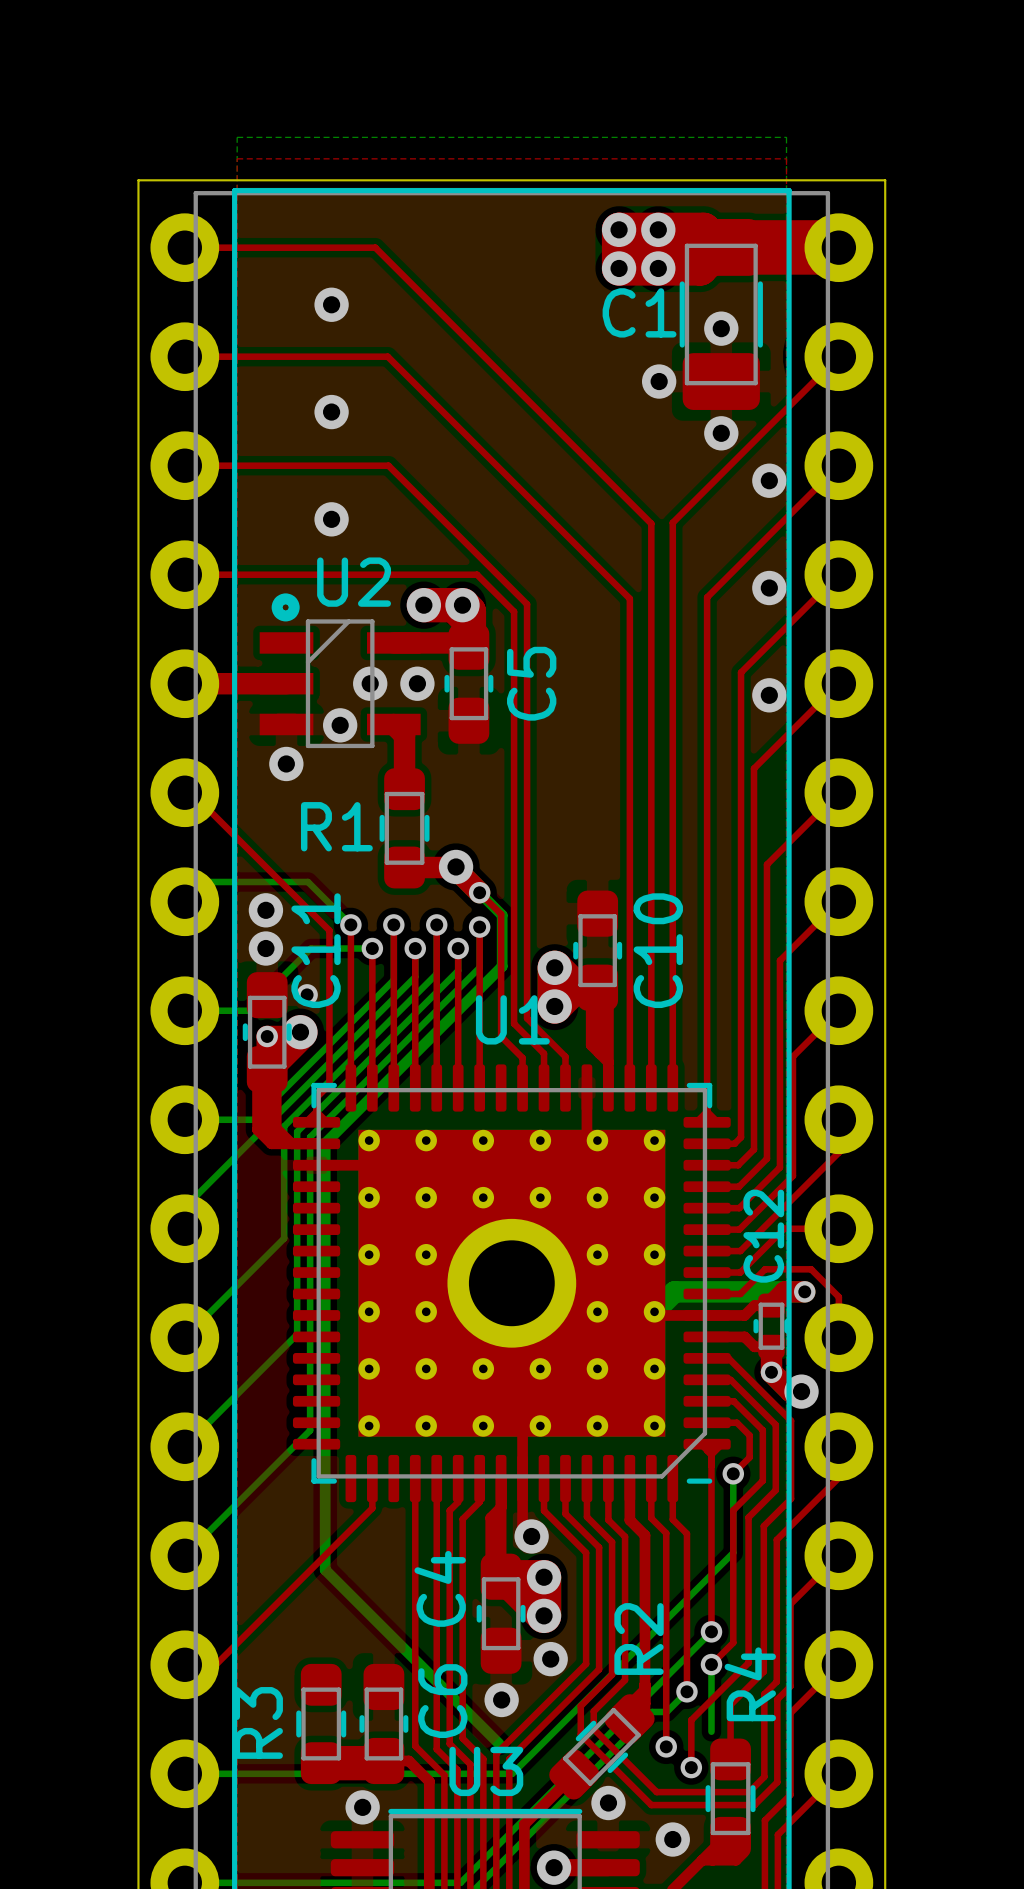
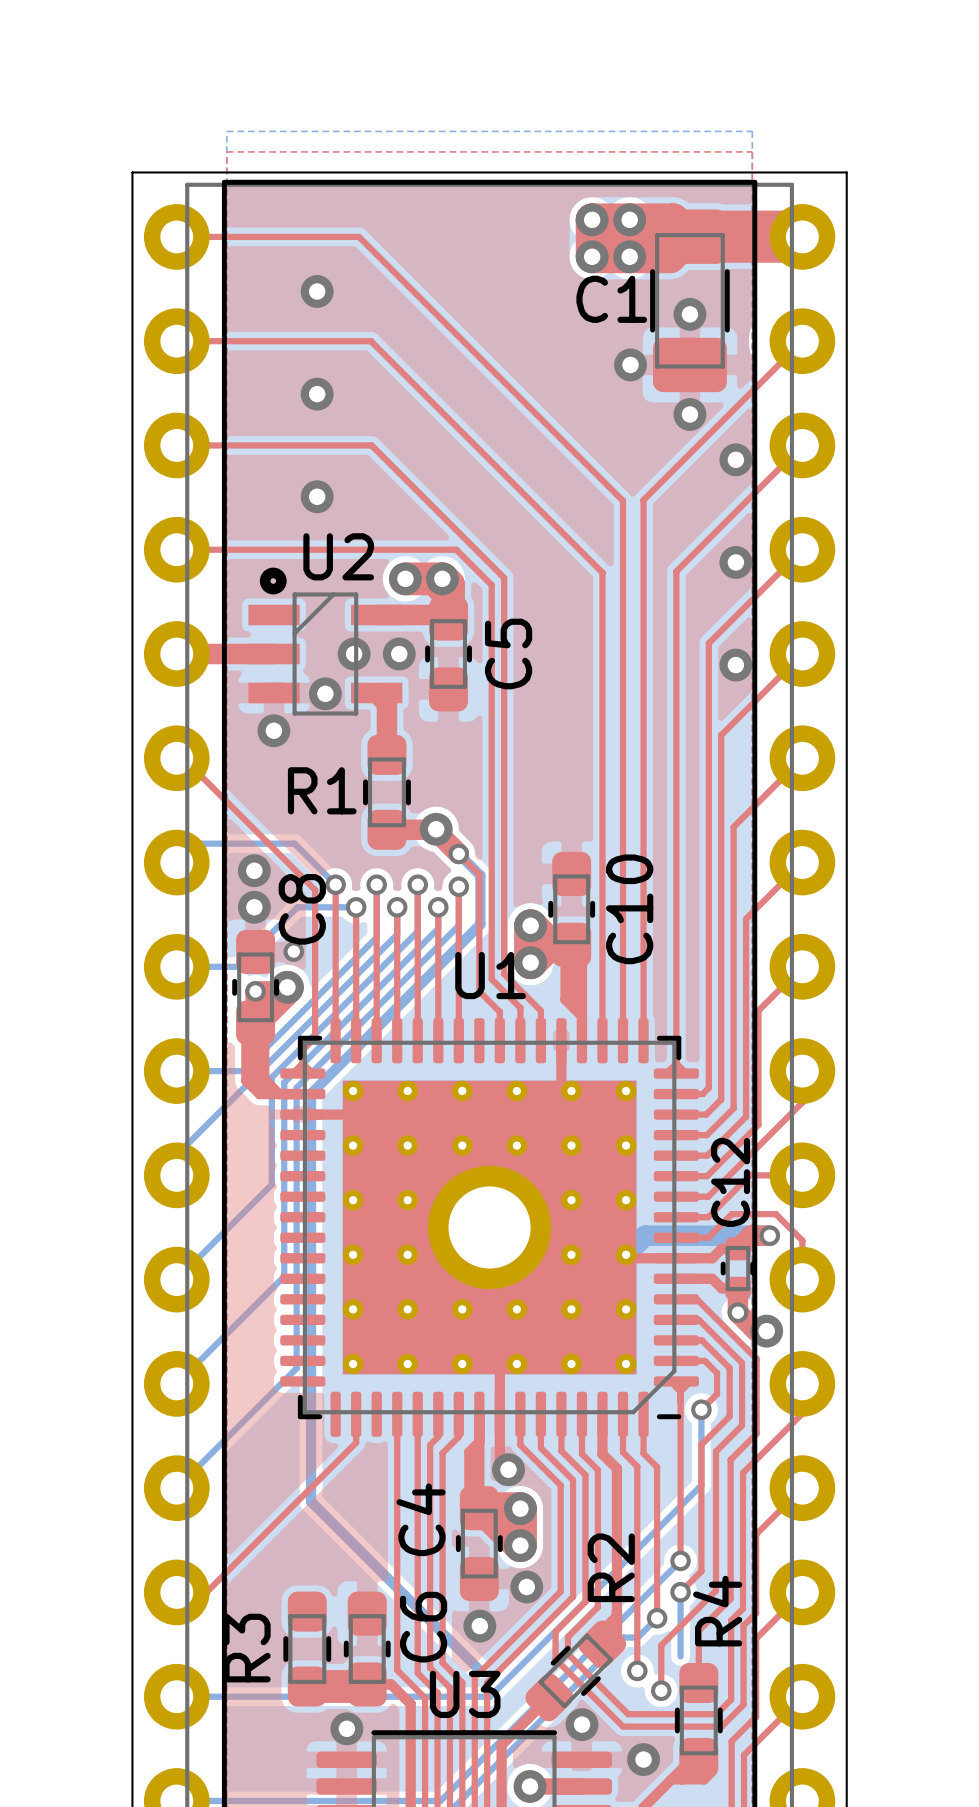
C11 name: C11 (316, 950) -> C8 (302, 909)

